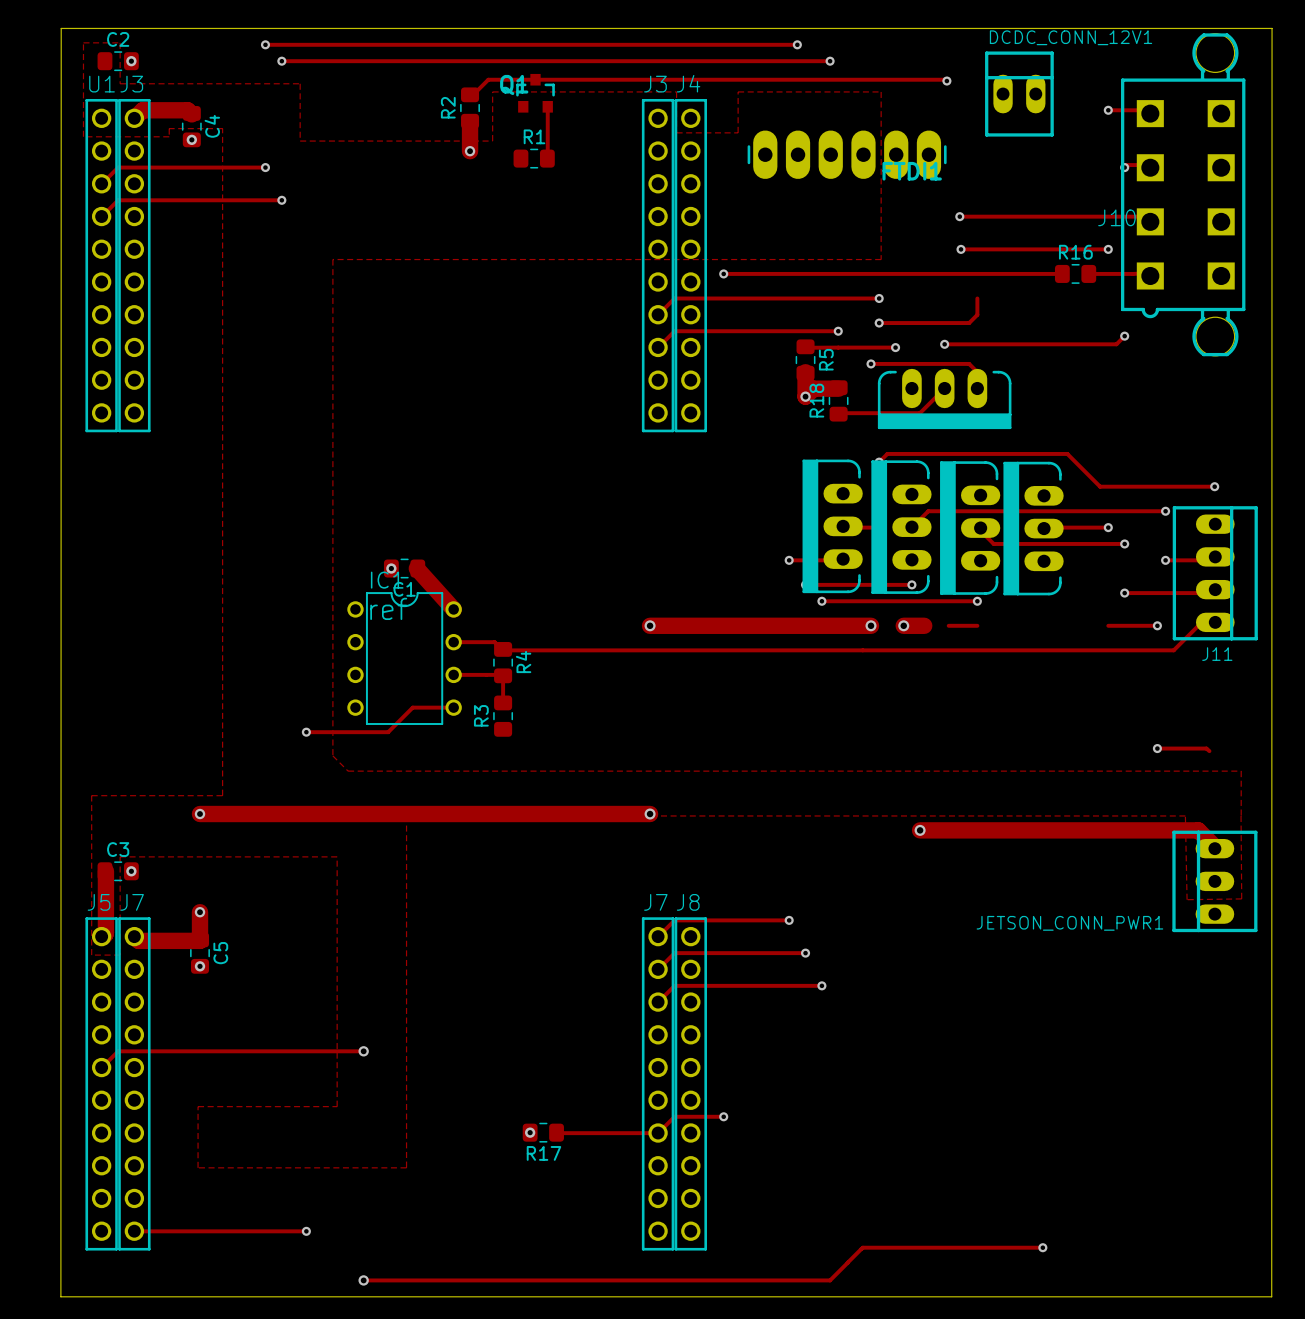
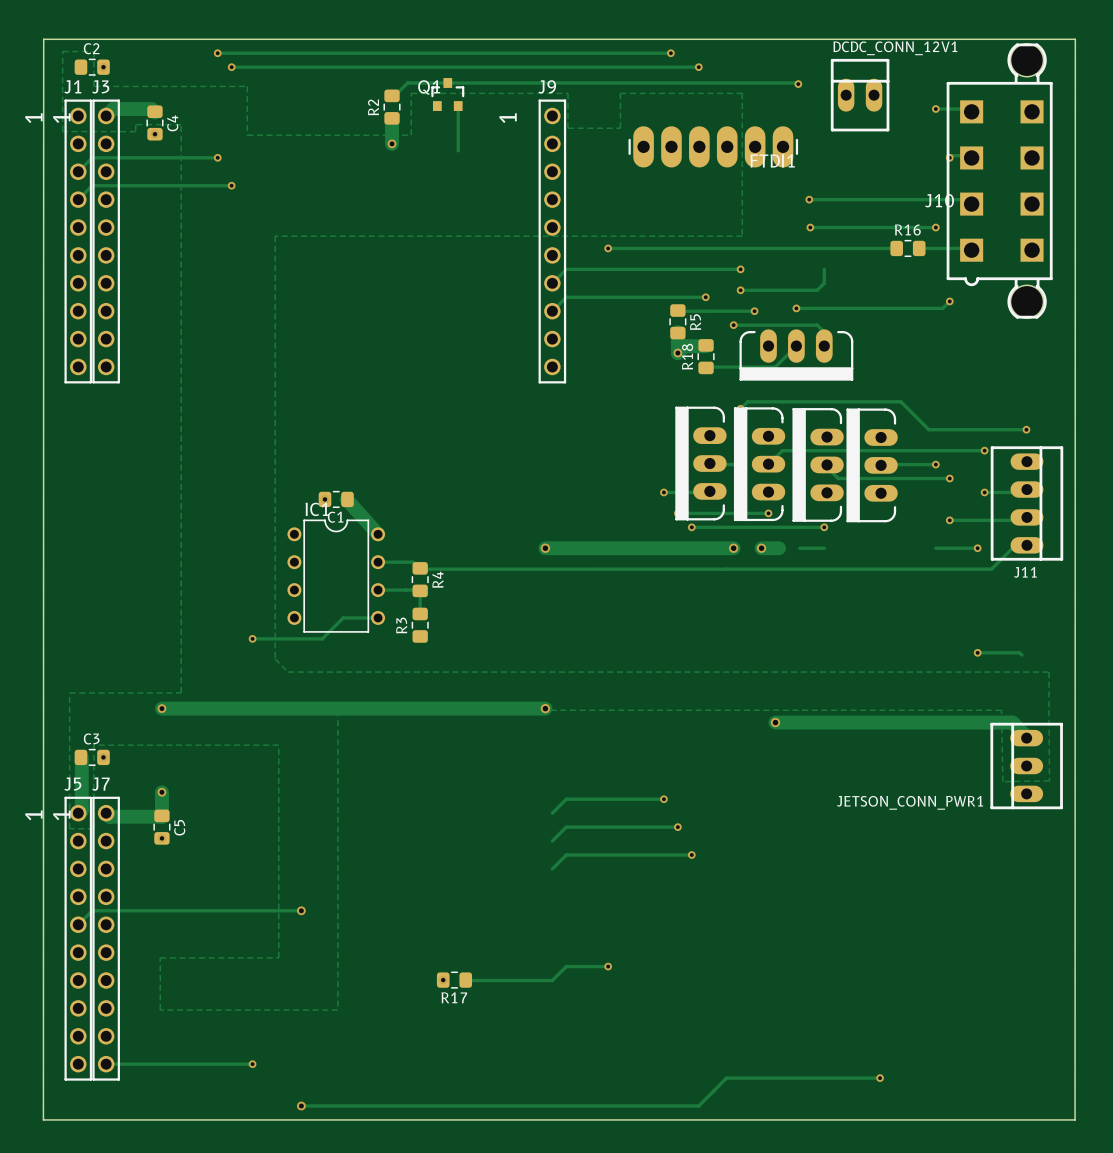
R1: (534, 158) -> none
J1: none -> (78, 241)
J3: none -> (106, 241)
J9: none -> (552, 241)
U1: (396, 674) -> none
J5: none -> (78, 938)
J7: none -> (106, 938)

